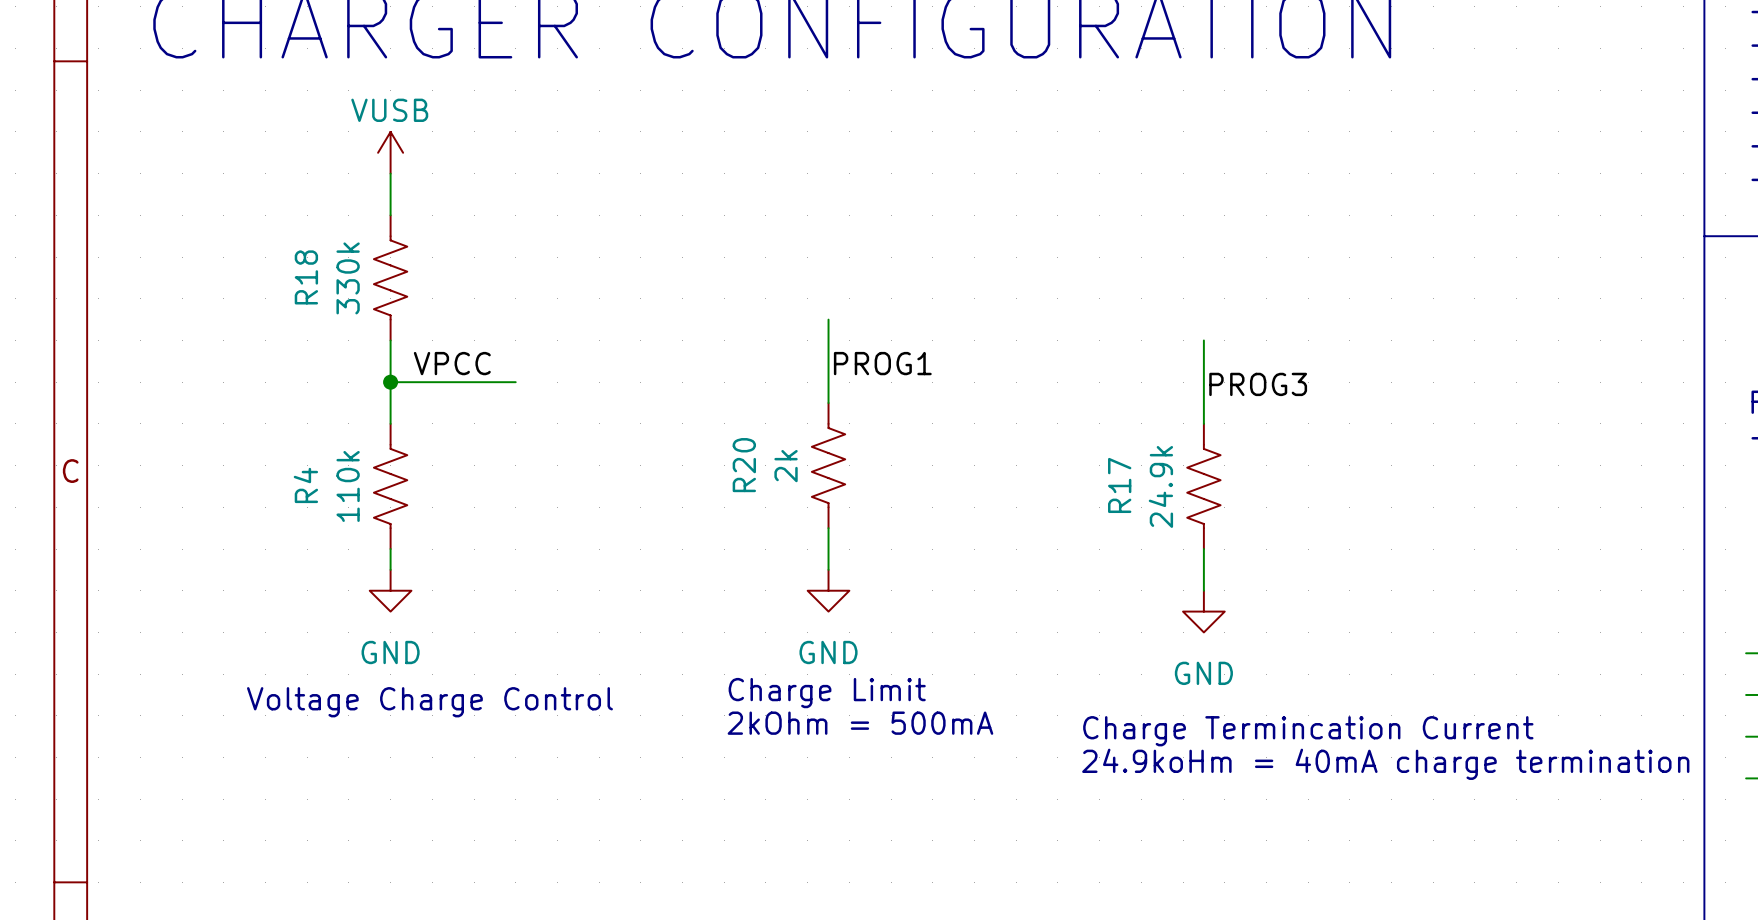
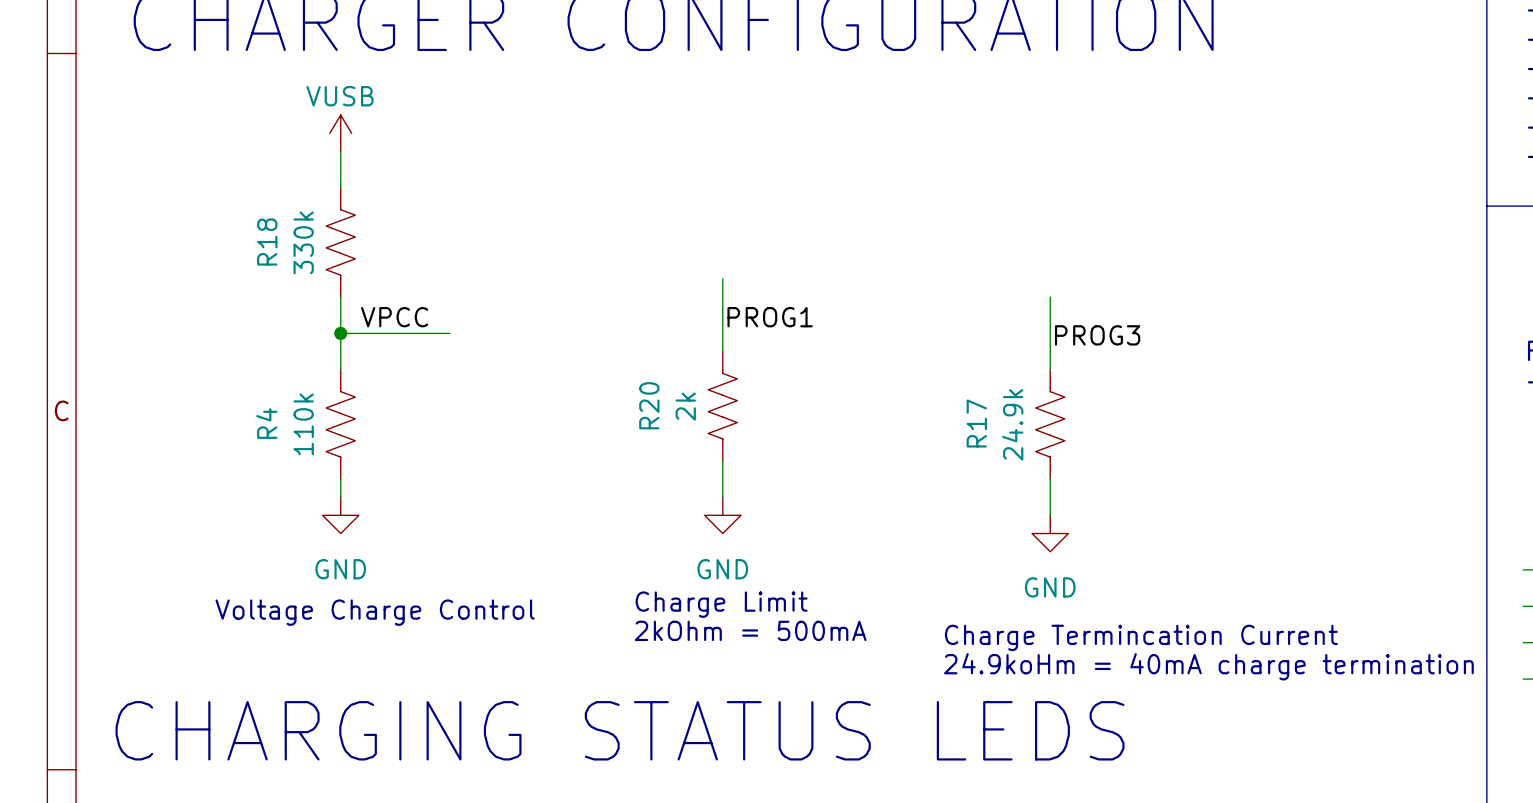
text: none -> CHARGING STATUS LEDS (620, 730)

